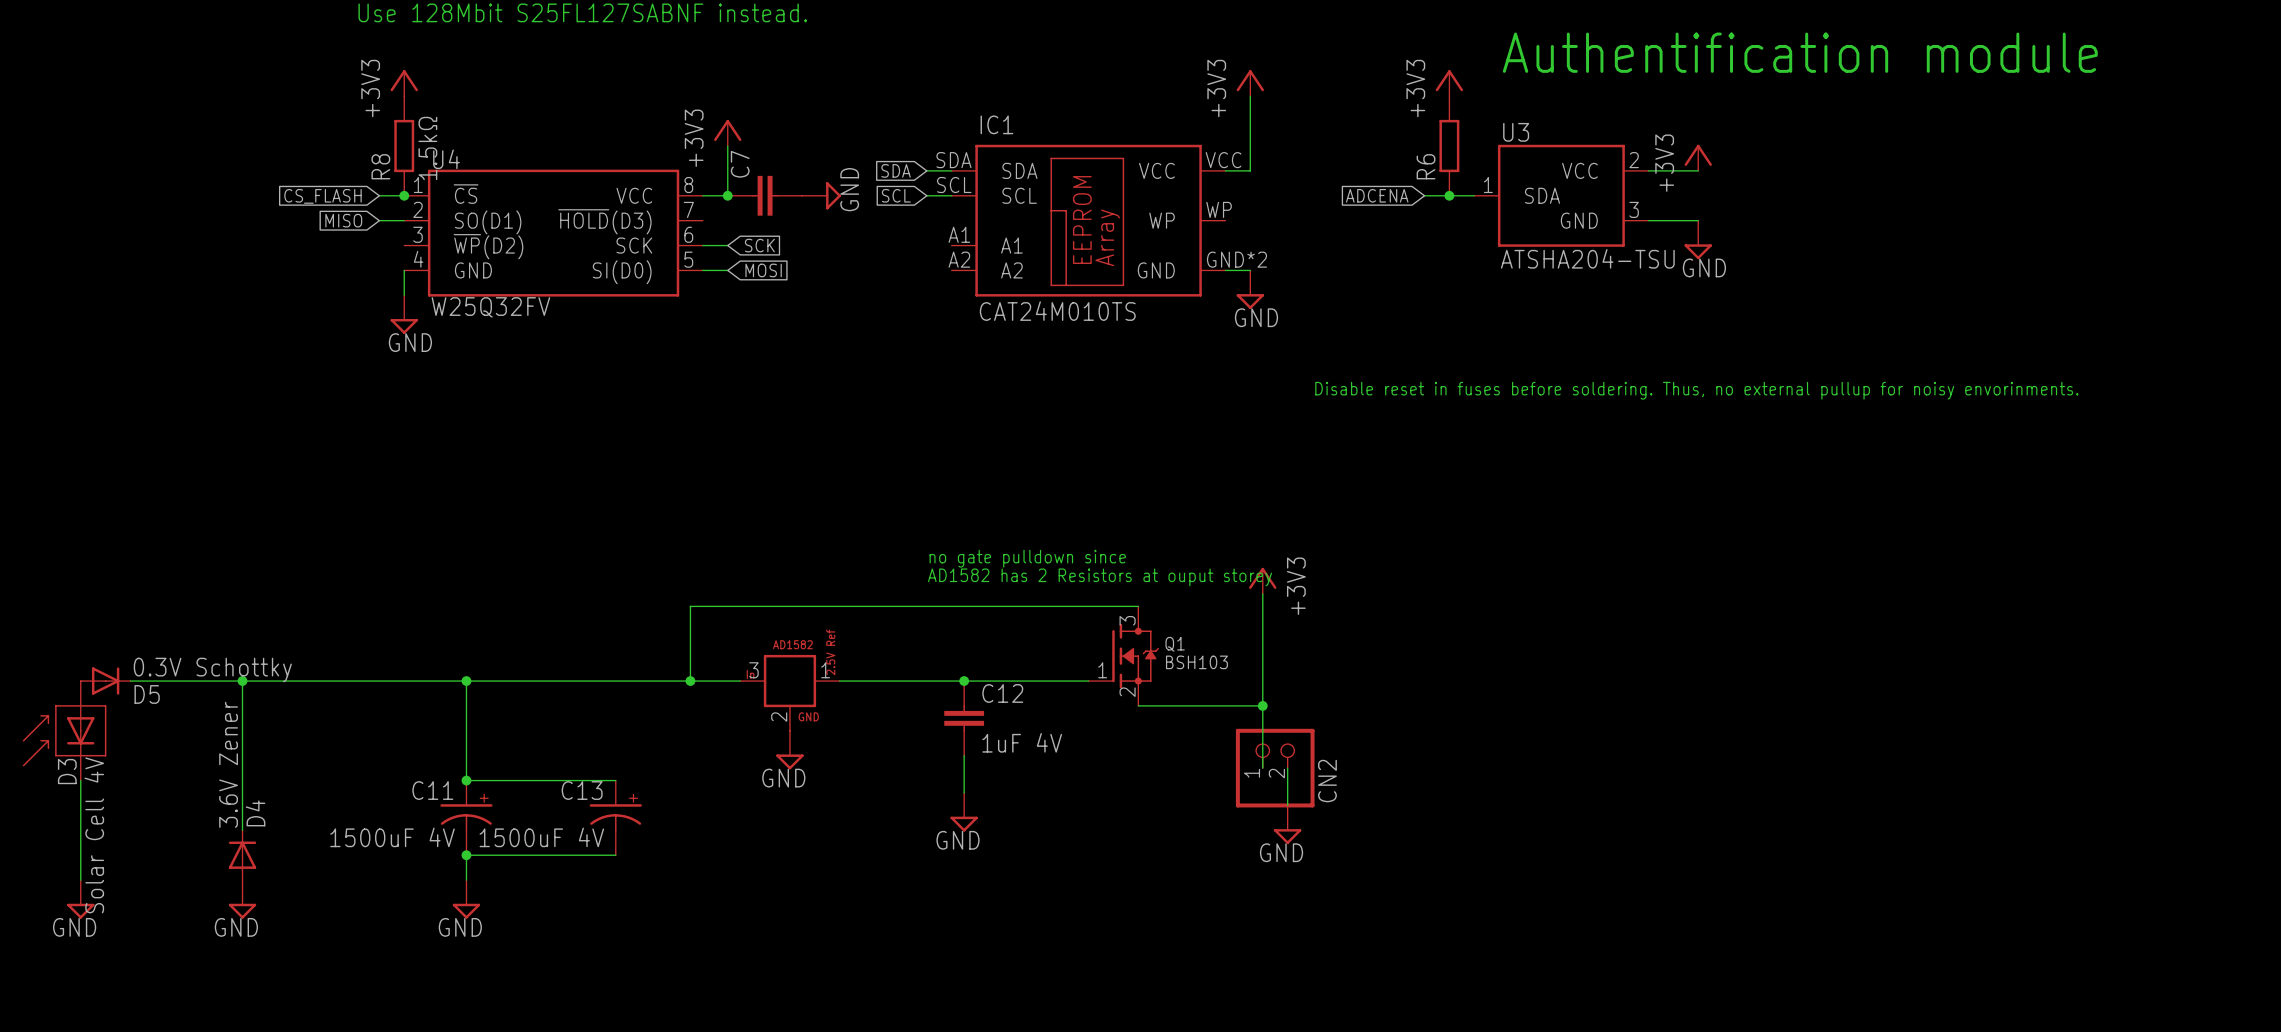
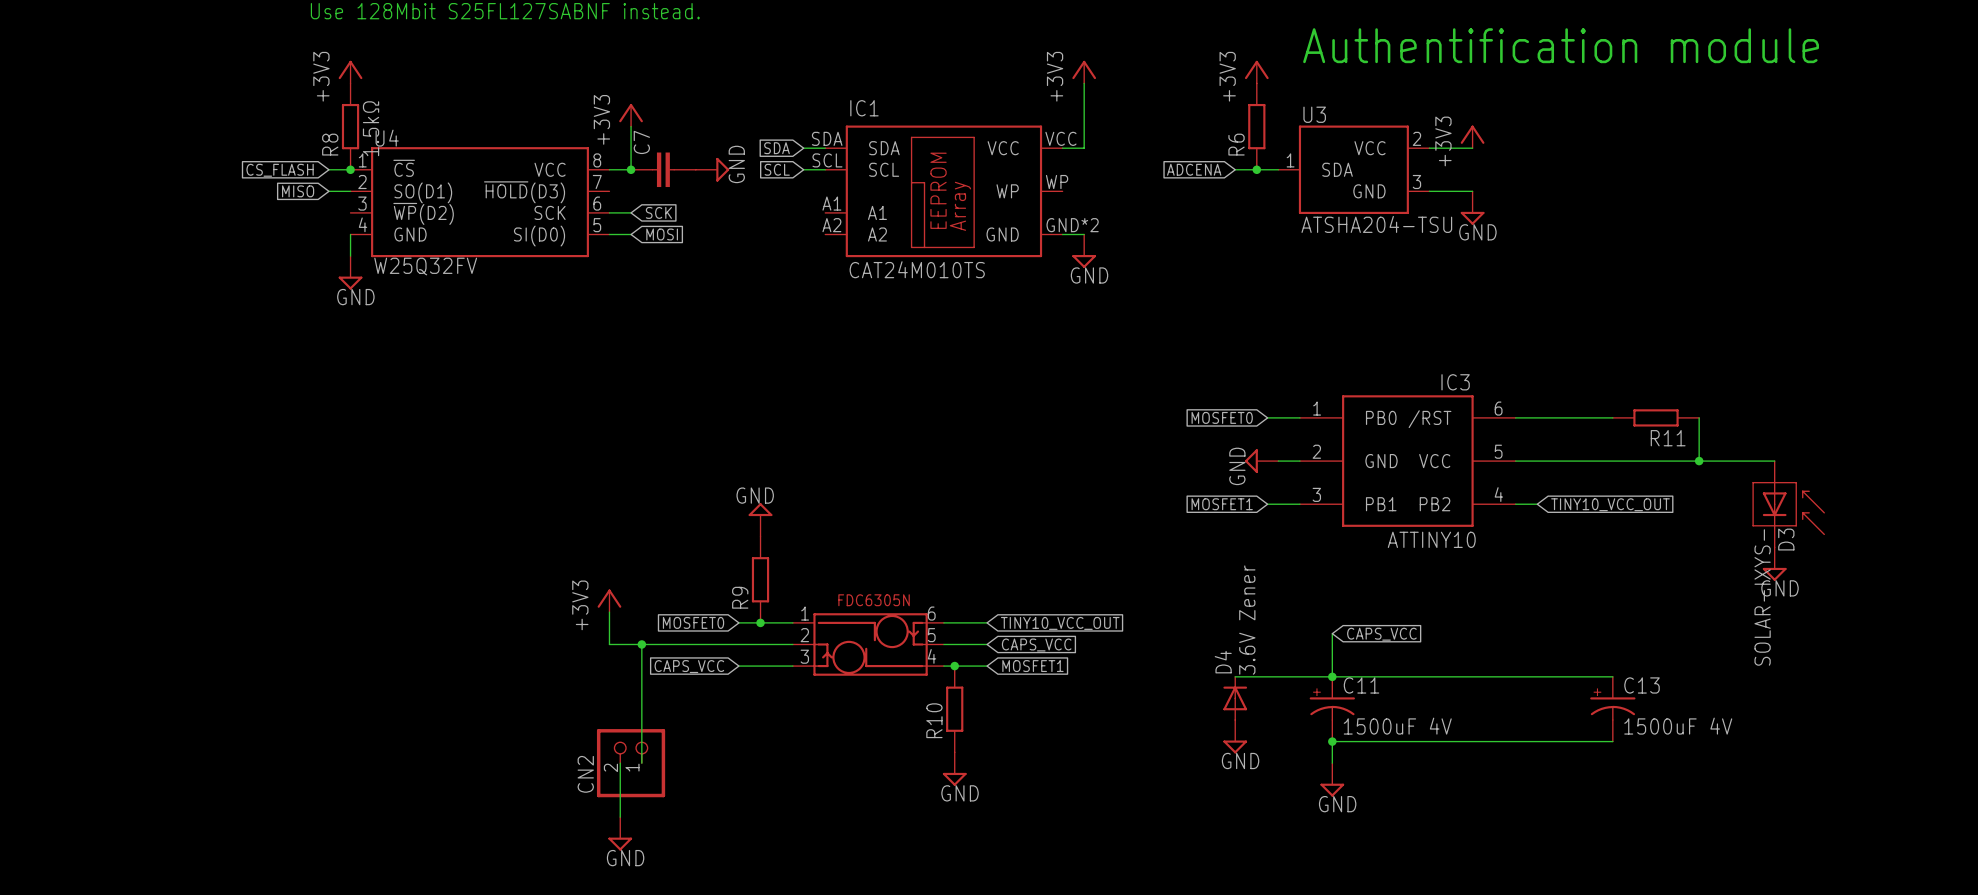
text: Disable reset in fuses before soldering. Thus, no external pullup for noisy envorinments. (1696, 390) -> none
global label: none -> MOSFET0 (1222, 417)
wire: none -> (1267, 417) (1299, 417)
wire: none -> (1515, 417) (1612, 417)
R11: none -> (1655, 417)
wire: none -> (1699, 417) (1699, 461)
power symbol: none -> GND (1261, 461)
wire: none -> (1278, 461) (1299, 461)
IC3: none -> ATTINY10 (1407, 461)
wire: none -> (1515, 461) (1774, 461)
junction: none -> (1699, 461)
text: no gate pulldown since (1027, 558) -> none
text: AD1582 has 2 Resistors at ouput storey (1099, 577) -> none
power symbol: +3V3 (1262, 580) -> none
global label: none -> MOSFET1 (1222, 504)
wire: none -> (1267, 504) (1299, 504)
wire: none -> (1515, 504) (1537, 504)
global label: none -> TINY10_VCC_OUT (1610, 504)
wire: (1262, 593) (1262, 768) -> none
power symbol: none -> GND (760, 519)
wire: (1138, 606) (690, 606) (690, 681) -> none
power symbol: none -> GND (1774, 564)
Q1: BSH103 (1123, 656) -> none
R9: none -> (760, 579)
D5: 0.3V Schottky (105, 681) -> none
wire: (130, 681) (740, 681) -> none
wire: (242, 681) (242, 830) -> none
junction: (242, 681) -> none
wire: (466, 681) (466, 780) (615, 780) -> none
junction: (466, 681) -> none
junction: (690, 681) -> none
wire: (839, 681) (1088, 681) -> none
junction: (964, 681) -> none
power symbol: none -> +3V3 (609, 600)
part: (789, 692) -> none
wire: none -> (609, 612) (609, 644) (792, 644)
wire: (1138, 705) (1262, 705) -> none
junction: (1262, 705) -> none
global label: none -> MOSFET0 (693, 622)
wire: none -> (738, 622) (792, 622)
junction: none -> (760, 622)
C12: 1uF 4V (964, 718) -> none
wire: none -> (943, 622) (987, 622)
global label: none -> TINY10_VCC_OUT (1060, 623)
D3 position: (64, 730) -> (1788, 504)
wire: none -> (1332, 633) (1332, 676)
global label: none -> CAPS_VCC (1381, 634)
D3 flip: as is (64, 735) -> left-right (1788, 508)
wire: none -> (641, 644) (641, 763)
junction: none -> (641, 644)
part: none -> (868, 644)
wire: none -> (943, 644) (987, 644)
global label: none -> CAPS_VCC (1036, 644)
power symbol: GND (789, 750) -> none
wire: (964, 755) (964, 793) -> none
D4 value position: 3.6V Zener (228, 764) -> 3.6V Zener (1247, 620)
global label: none -> CAPS_VCC (689, 666)
wire: none -> (738, 666) (792, 666)
wire: none -> (943, 666) (987, 666)
junction: none -> (954, 666)
global label: none -> MOSFET1 (1032, 666)
CN2 flip: as is (1275, 768) -> left-right (631, 763)
CN2 position: (1275, 768) -> (631, 763)
wire: (1287, 768) (1287, 805) -> none
wire: (80, 780) (80, 880) -> none
junction: (466, 780) -> none
wire: none -> (1235, 676) (1612, 676)
junction: none -> (1332, 676)
C11 flip: as is (466, 812) -> left-right (1332, 704)
C13 flip: as is (615, 812) -> left-right (1612, 704)
power symbol: GND (964, 812) -> none
D4 name position: D4 (255, 813) -> D4 (1223, 662)
C11 position: (466, 817) -> (1332, 709)
C13 position: (615, 817) -> (1612, 709)
R10: none -> (954, 709)
power symbol: GND (1287, 824) -> none
D3 value: Solar Cell 4V (94, 835) -> SOLAR-IXYS- (1762, 597)
power symbol: none -> GND (1235, 736)
D4 position: (242, 855) -> (1235, 698)
junction: (466, 855) -> none
wire: (615, 855) (466, 855) (466, 880) -> none
junction: none -> (1332, 741)
wire: none -> (1612, 741) (1332, 741) (1332, 763)
wire: none -> (620, 763) (620, 817)
power symbol: none -> GND (954, 769)
power symbol: GND (80, 899) -> none
power symbol: GND (242, 899) -> none
power symbol: GND (466, 899) -> none
power symbol: none -> GND (1332, 779)
power symbol: none -> GND (620, 833)

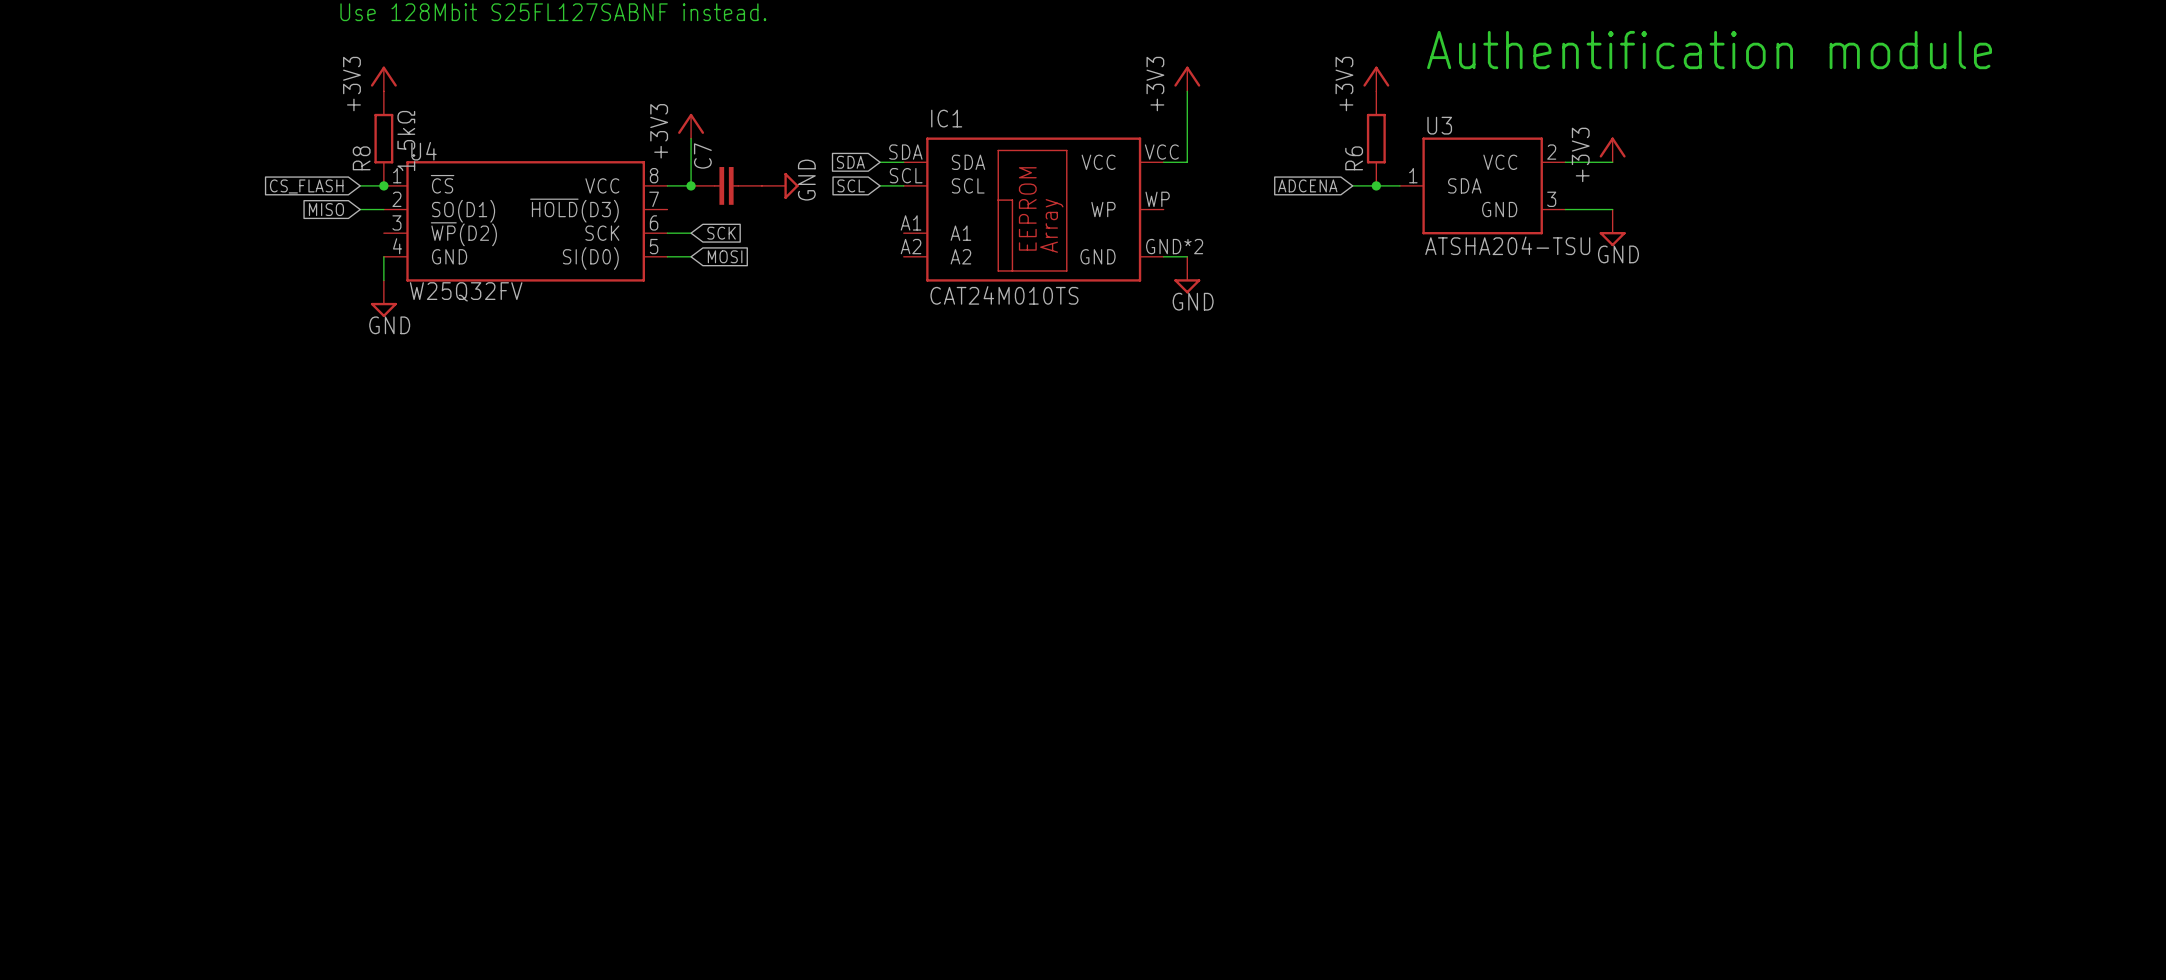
global label: MOSFET0 (1222, 417) -> none
wire: (1267, 417) (1299, 417) -> none
wire: (1515, 417) (1612, 417) -> none
R11: (1655, 417) -> none
wire: (1699, 417) (1699, 461) -> none
power symbol: GND (1261, 461) -> none
wire: (1278, 461) (1299, 461) -> none
IC3: ATTINY10 (1407, 461) -> none
wire: (1515, 461) (1774, 461) -> none
junction: (1699, 461) -> none
global label: MOSFET1 (1222, 504) -> none
wire: (1267, 504) (1299, 504) -> none
wire: (1515, 504) (1537, 504) -> none
global label: TINY10_VCC_OUT (1610, 504) -> none
D3: SOLAR-IXYS- (1788, 504) -> none
power symbol: GND (760, 519) -> none
power symbol: GND (1774, 564) -> none
R9: (760, 579) -> none
power symbol: +3V3 (609, 600) -> none
wire: (609, 612) (609, 644) (792, 644) -> none
global label: MOSFET0 (693, 622) -> none
wire: (738, 622) (792, 622) -> none
junction: (760, 622) -> none
wire: (943, 622) (987, 622) -> none
global label: TINY10_VCC_OUT (1060, 623) -> none
wire: (1332, 633) (1332, 676) -> none
global label: CAPS_VCC (1381, 634) -> none
wire: (641, 644) (641, 763) -> none
junction: (641, 644) -> none
part: (868, 644) -> none
wire: (943, 644) (987, 644) -> none
global label: CAPS_VCC (1036, 644) -> none
global label: CAPS_VCC (689, 666) -> none
wire: (738, 666) (792, 666) -> none
wire: (943, 666) (987, 666) -> none
junction: (954, 666) -> none
global label: MOSFET1 (1032, 666) -> none
wire: (1235, 676) (1612, 676) -> none
junction: (1332, 676) -> none
D4: 3.6V Zener (1235, 698) -> none
R10: (954, 709) -> none
C11: 1500uF 4V (1332, 709) -> none
C13: 1500uF 4V (1612, 709) -> none
power symbol: GND (1235, 736) -> none
junction: (1332, 741) -> none
wire: (1612, 741) (1332, 741) (1332, 763) -> none
wire: (620, 763) (620, 817) -> none
CN2: (631, 763) -> none
power symbol: GND (954, 769) -> none
power symbol: GND (1332, 779) -> none
power symbol: GND (620, 833) -> none

